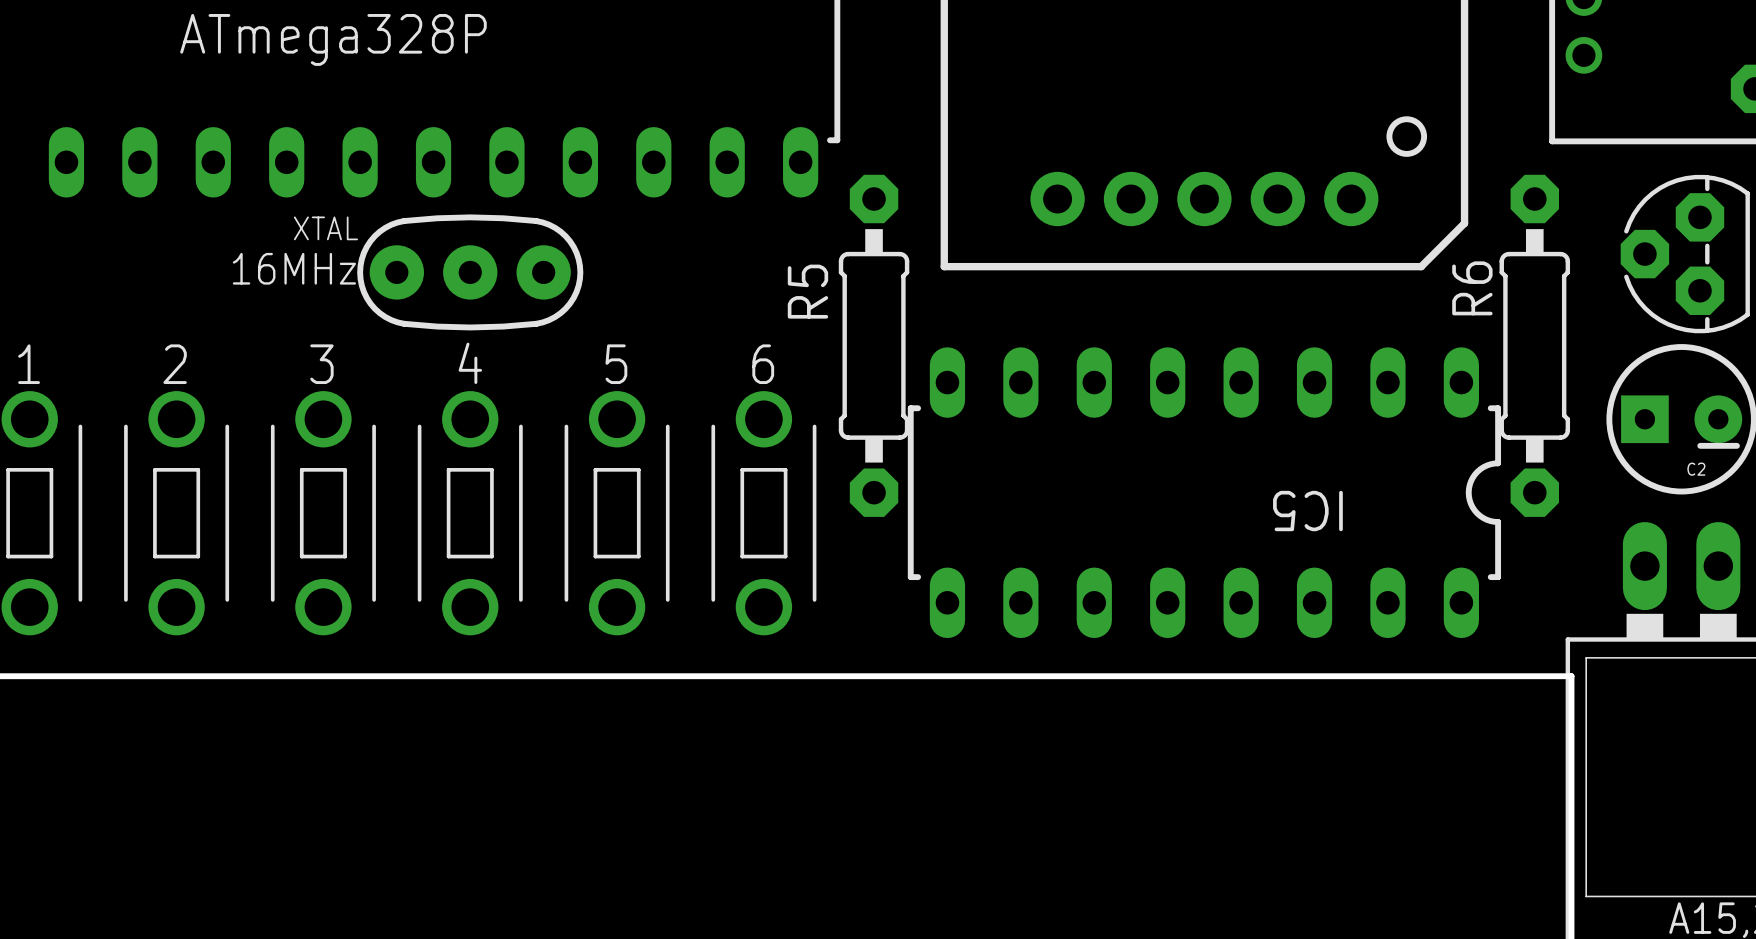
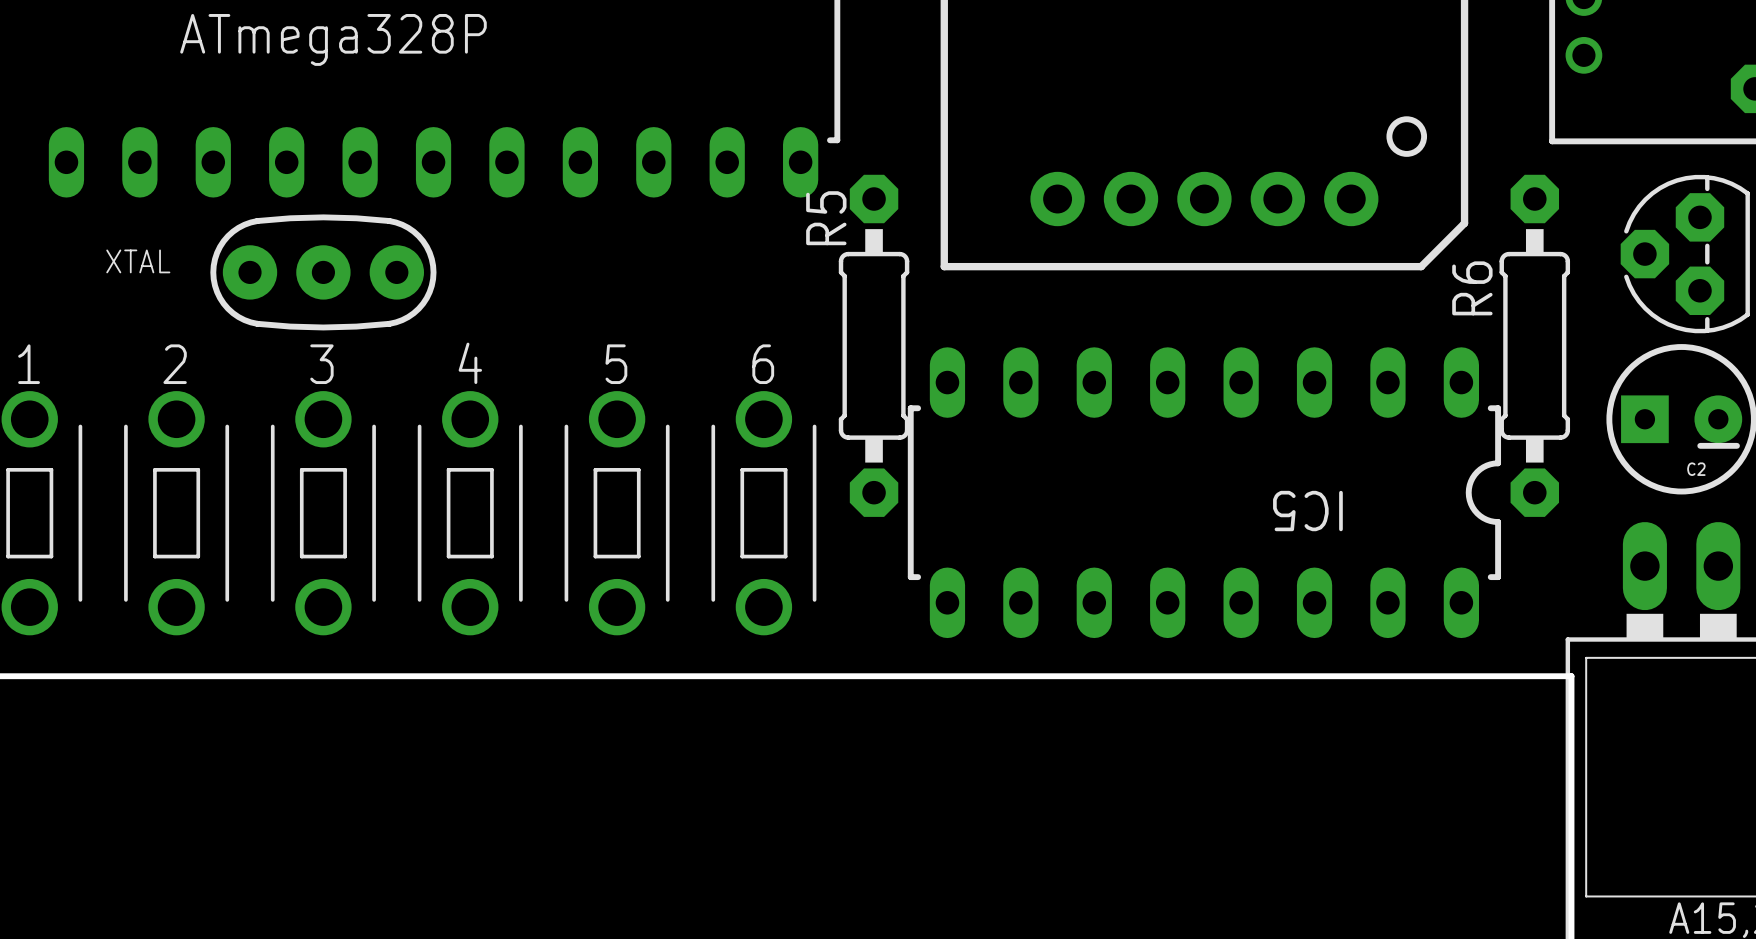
text position: XTAL (325, 228) -> XTAL (138, 261)
text: 16MHz (294, 268) -> none
part position: (470, 272) -> (323, 272)
R5 name position: R5 (807, 291) -> R5 (826, 218)

